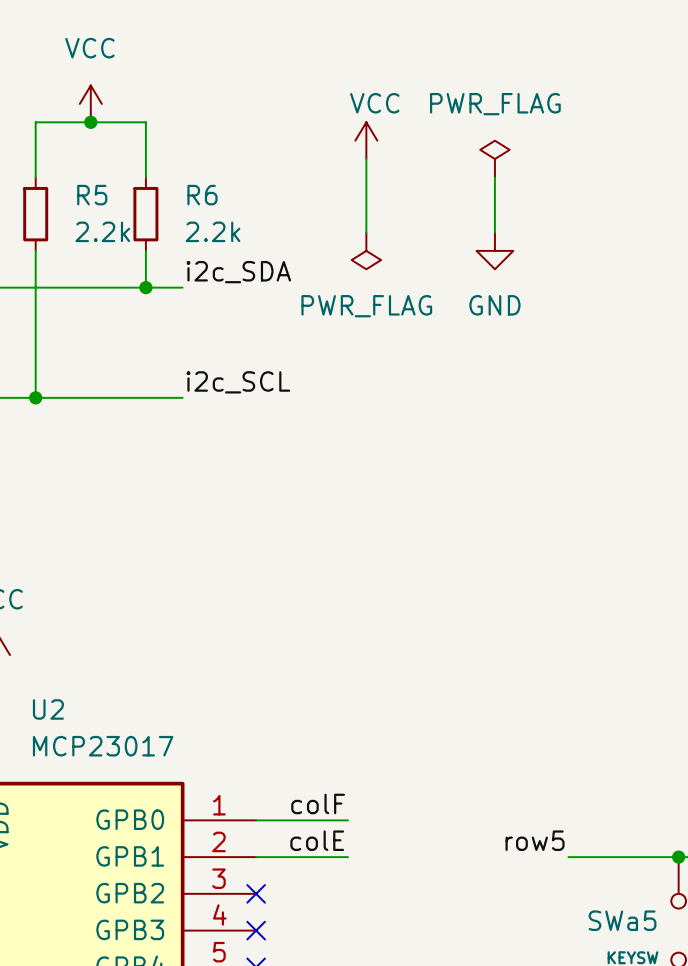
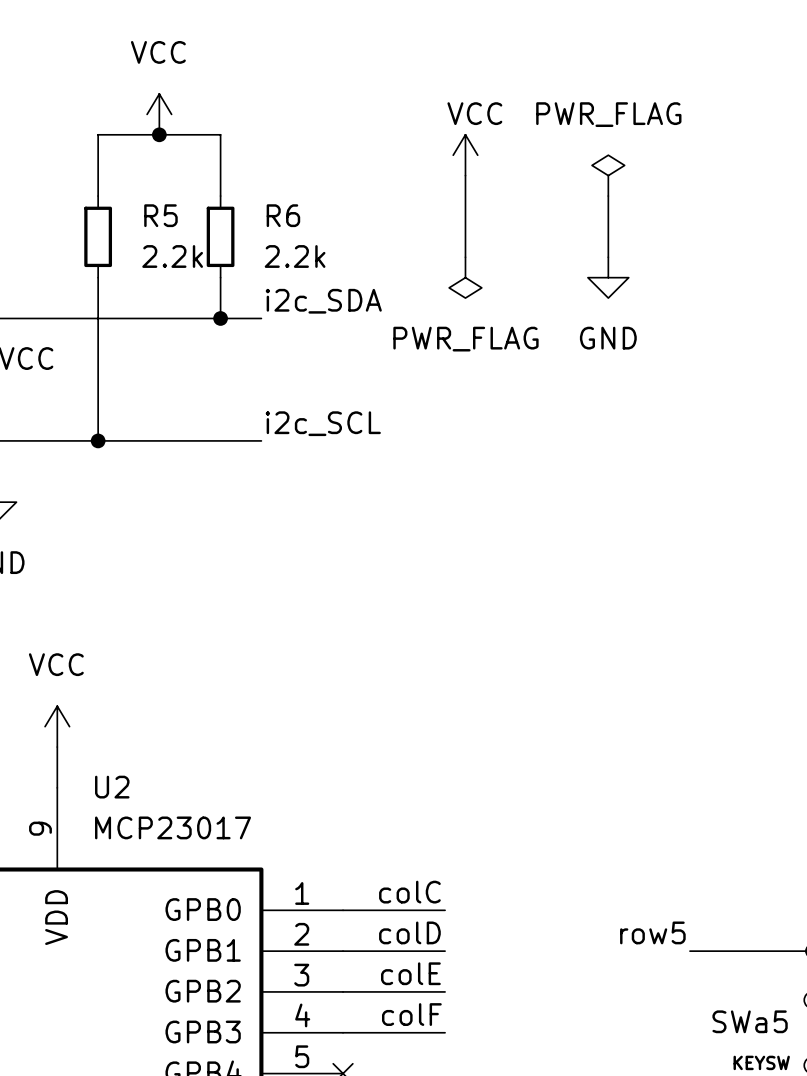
label: colF (318, 803) -> colC (409, 892)
label: colE (317, 840) -> colD (409, 932)
label: none -> colE (410, 973)
wire: none -> (343, 991) (445, 991)
no-connect mark: (256, 893) -> none
label: none -> colF (411, 1014)
wire: none -> (343, 1032) (445, 1032)
no-connect mark: (256, 930) -> none

